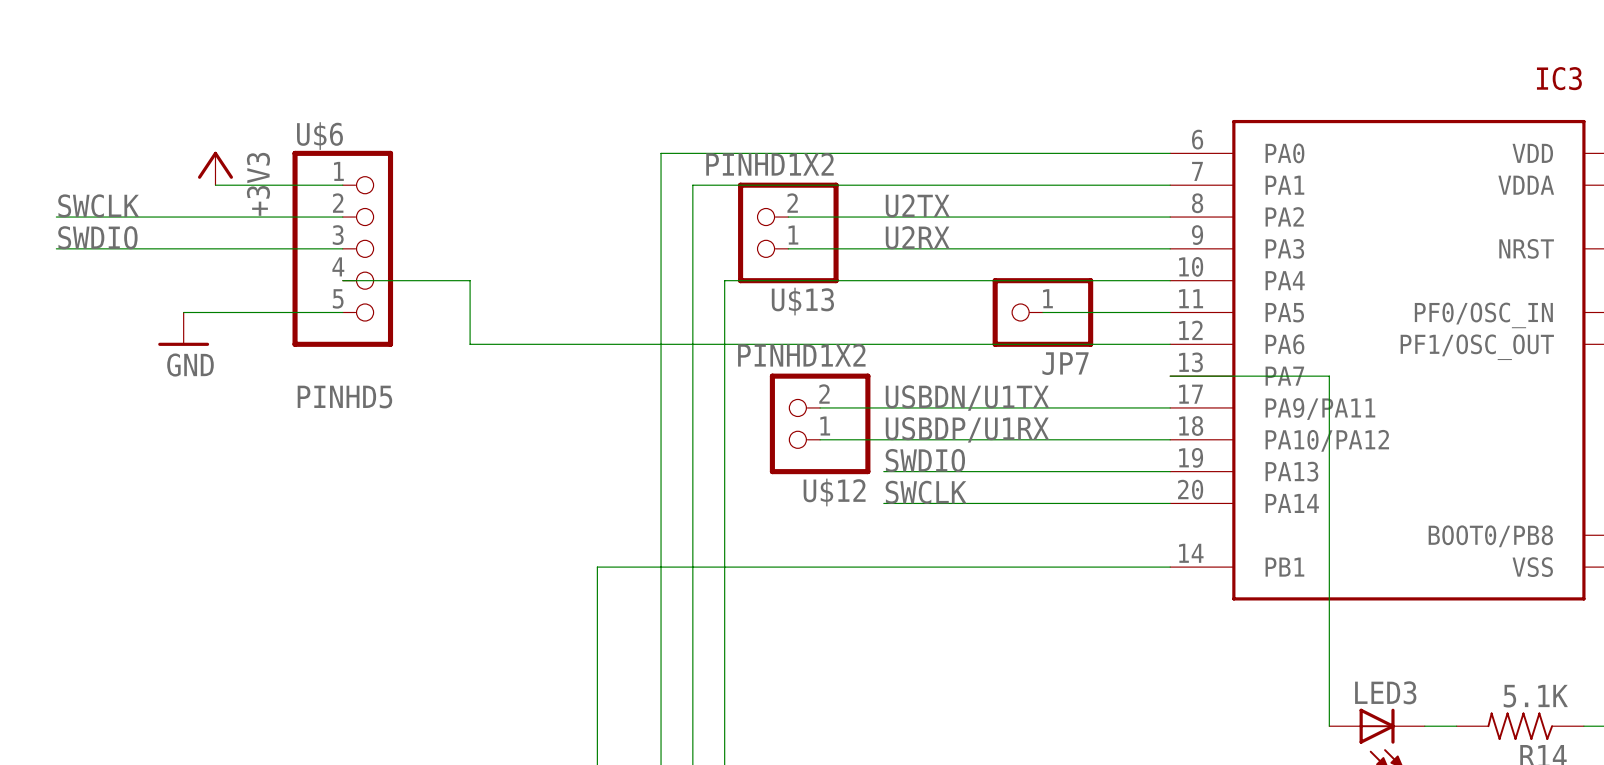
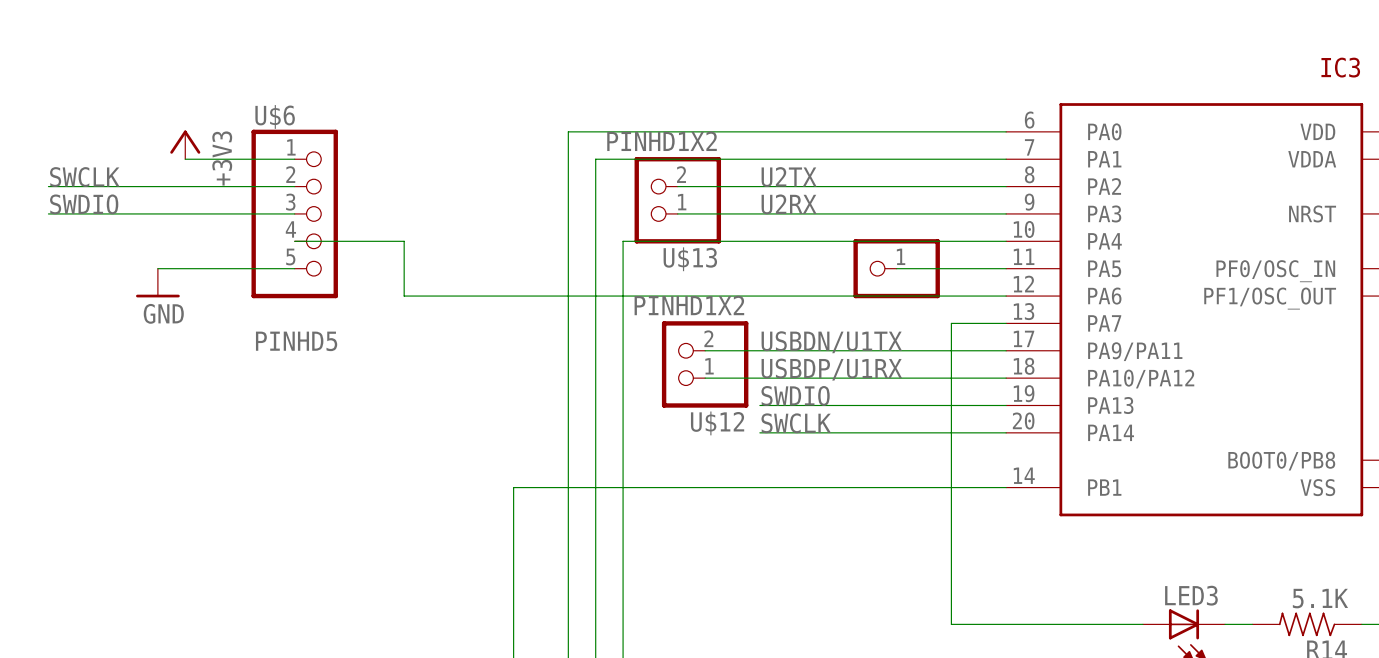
JP7 name: JP7 (1065, 363) -> none
wire: (1170, 376) (1329, 376) (1329, 726) -> (1006, 323) (951, 323) (951, 624) (1142, 624)

